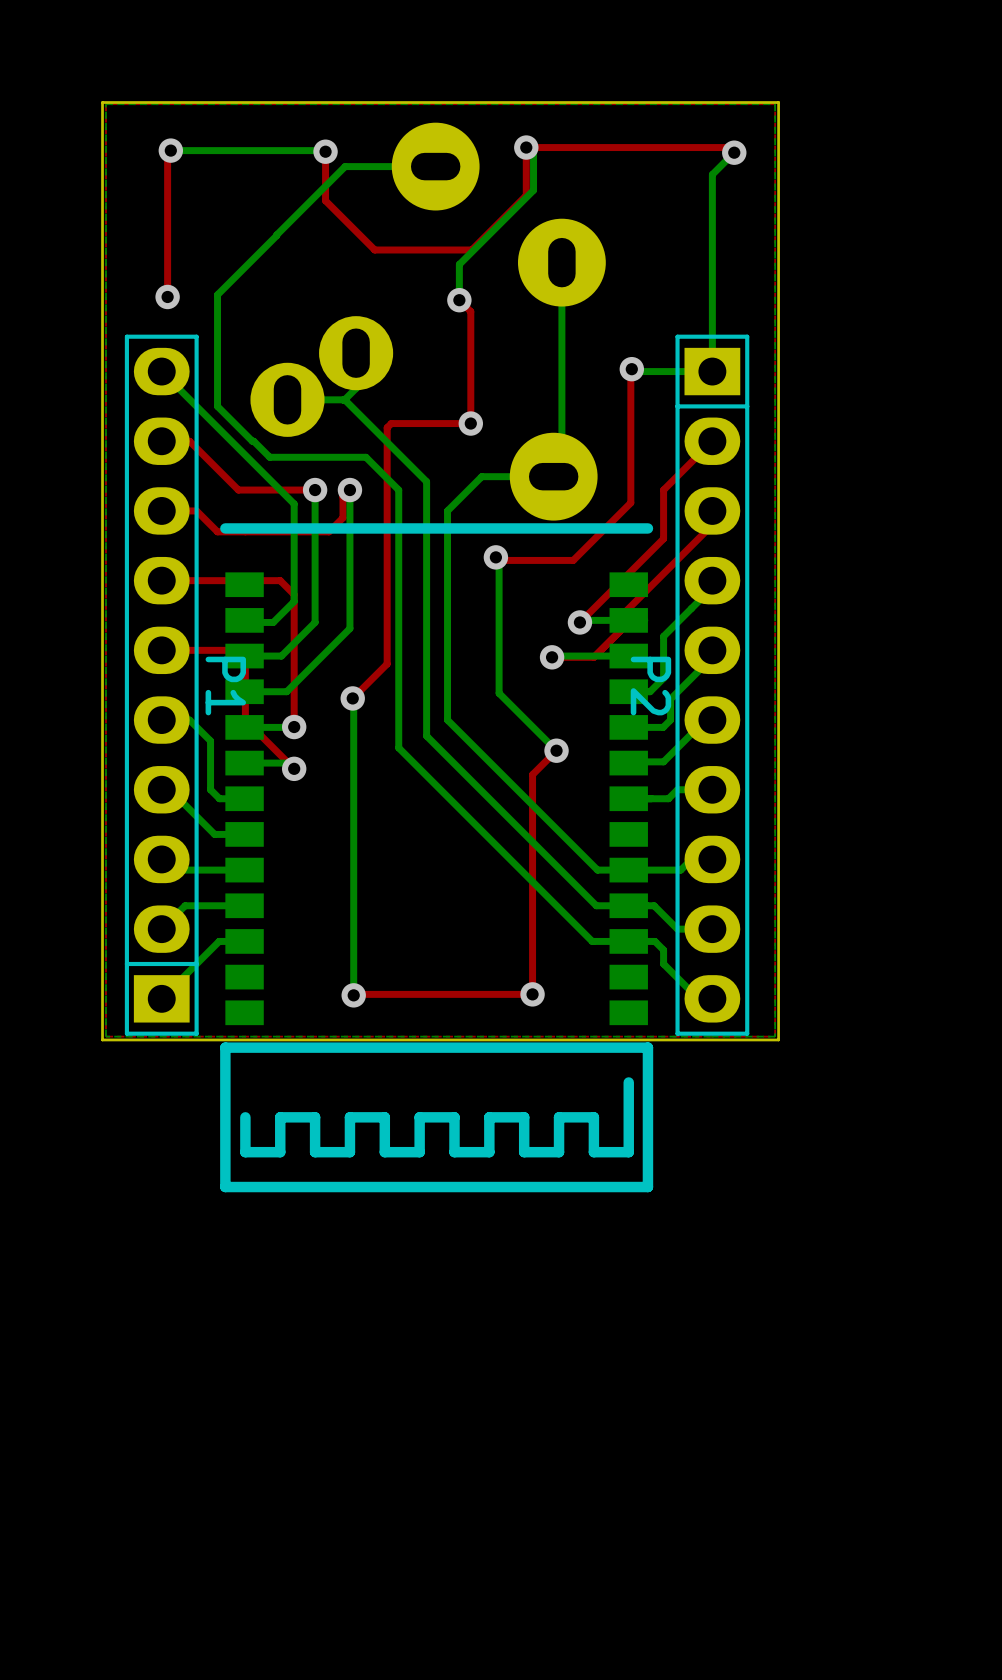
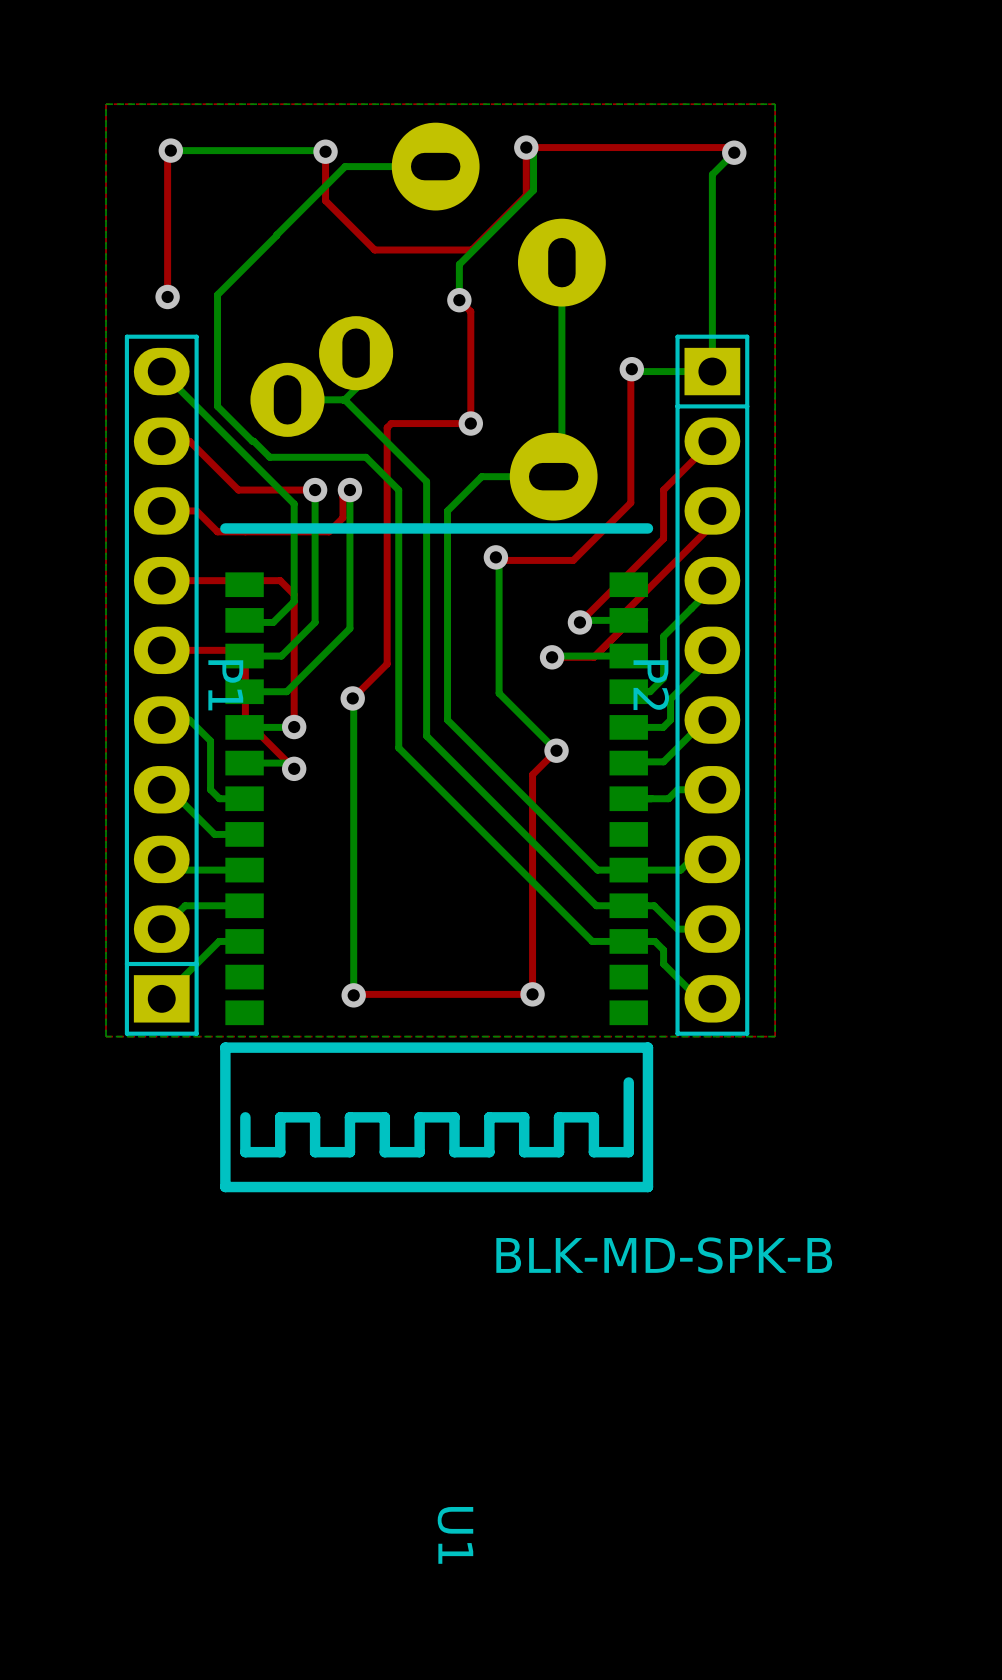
board edge: (778, 102) (778, 1039) (102, 1039) (102, 102) (778, 102) -> none
U1 value: none -> BLK-MD-SPK-B (664, 1255)
U1 name: none -> U1 (455, 1535)

